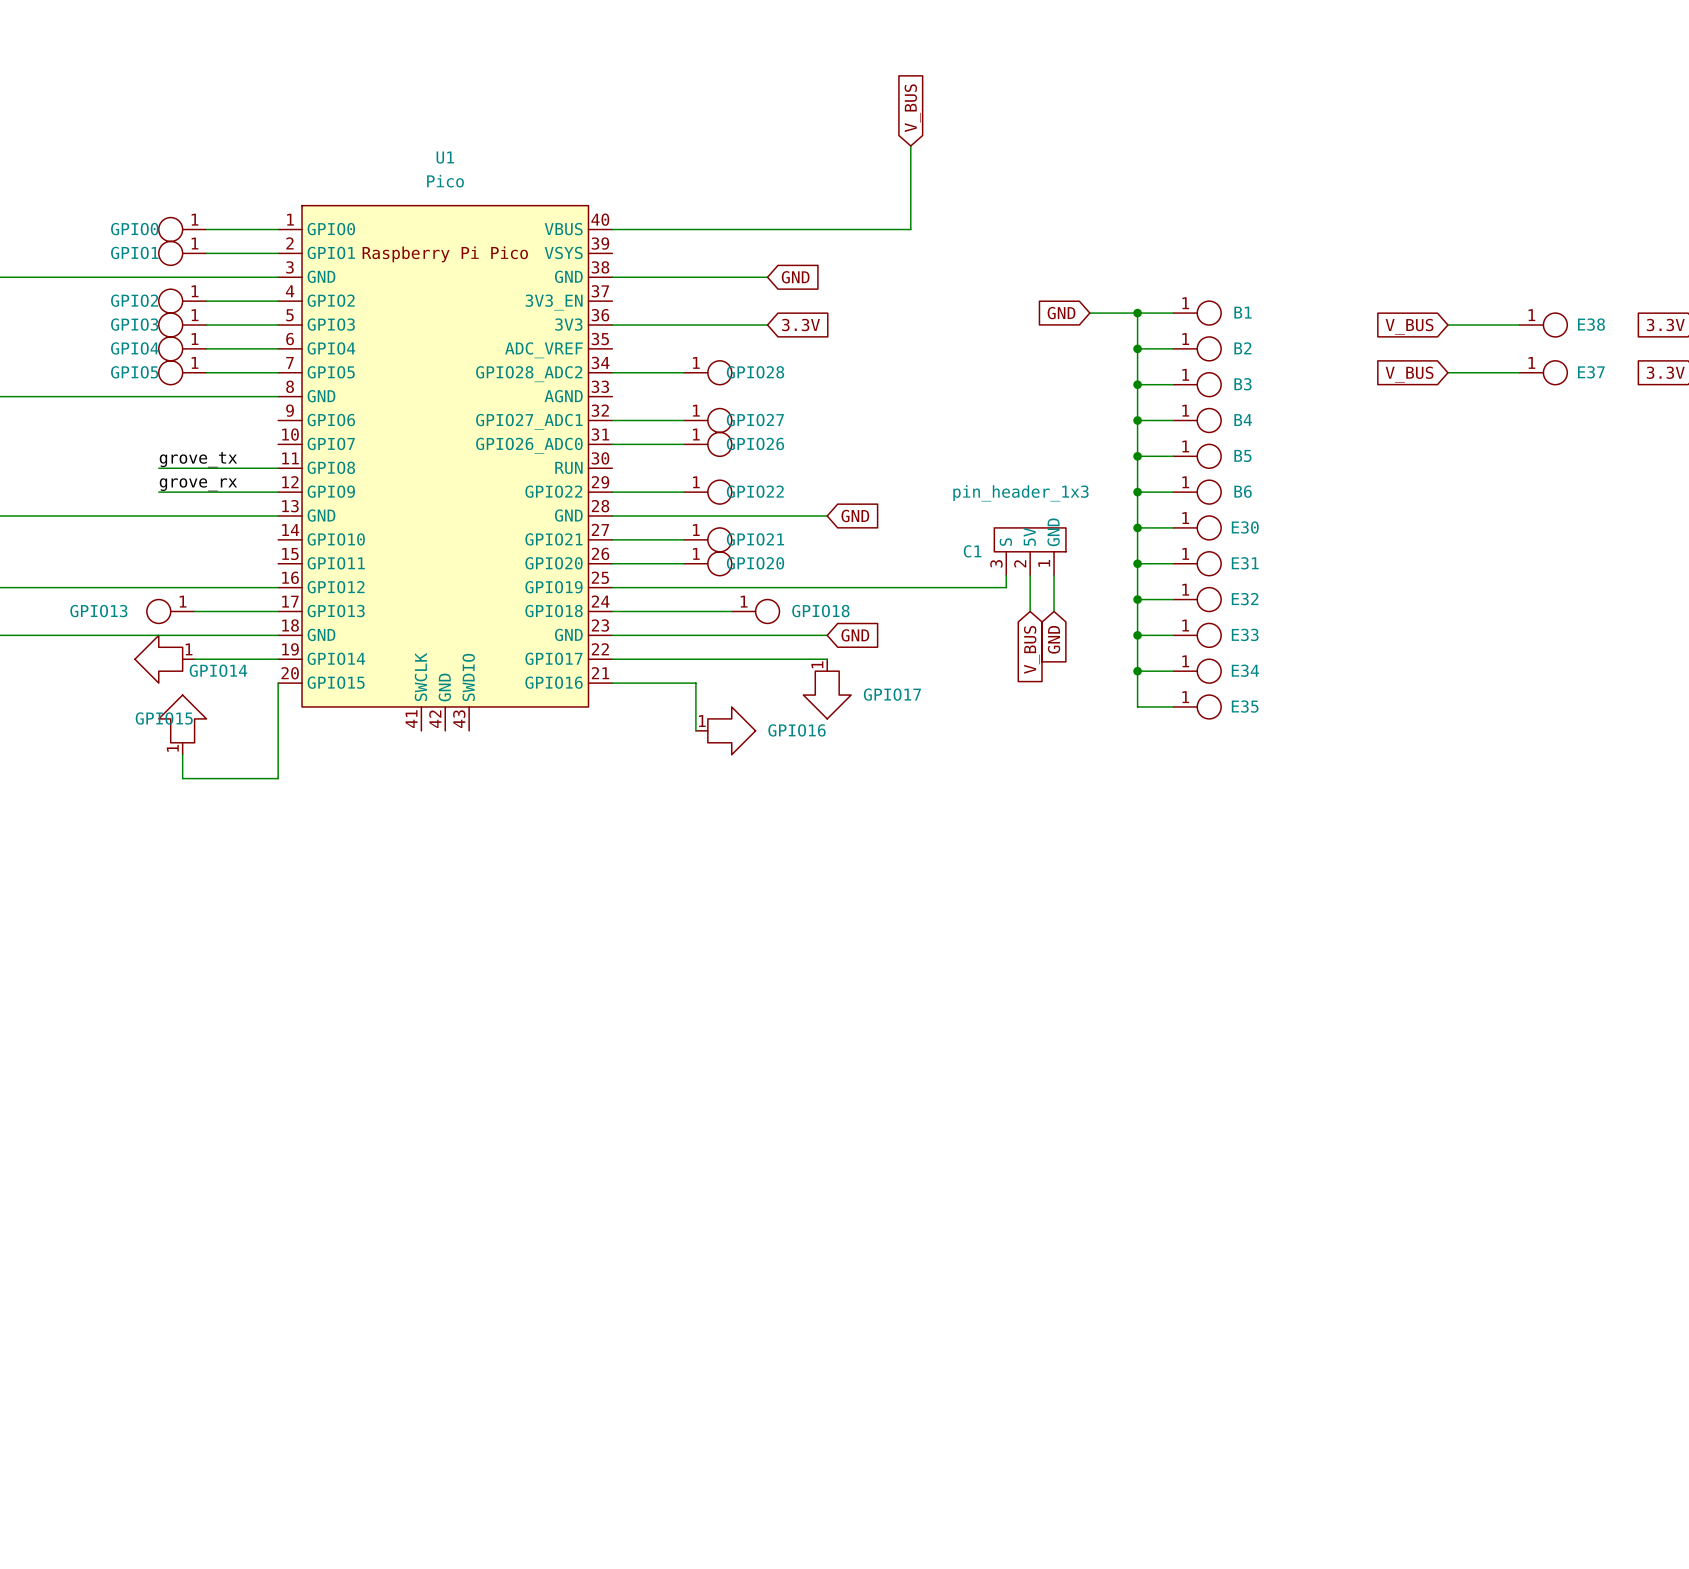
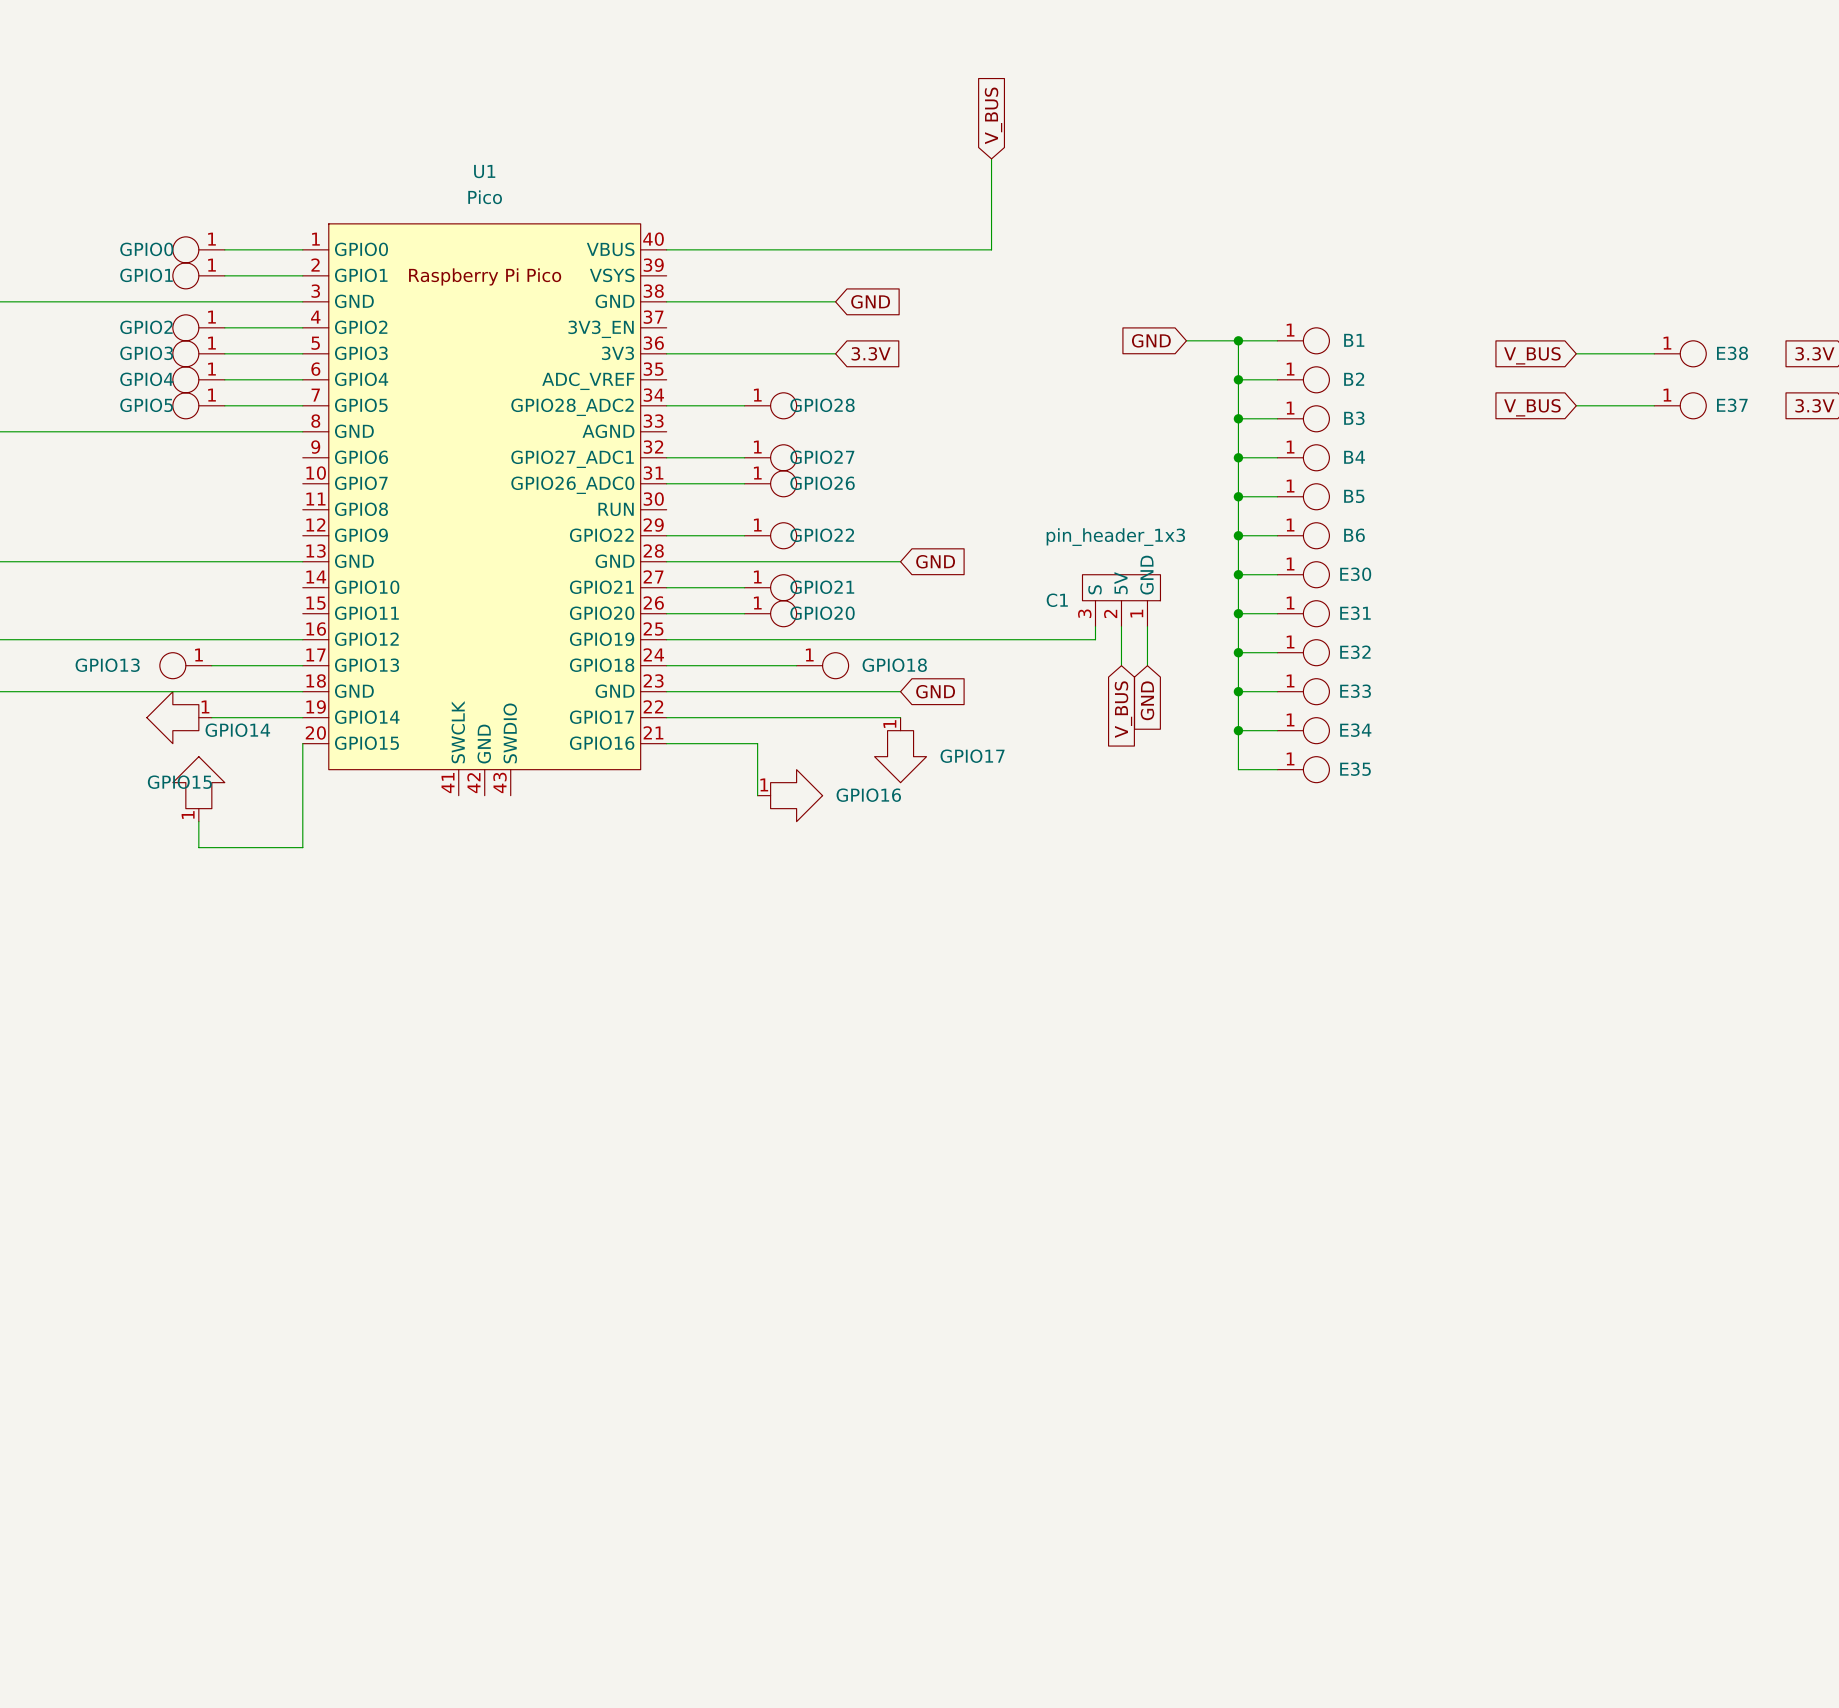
label: grove_tx (198, 459) -> none
wire: (158, 468) (278, 468) -> none
label: grove_rx (198, 484) -> none
wire: (158, 492) (278, 492) -> none

